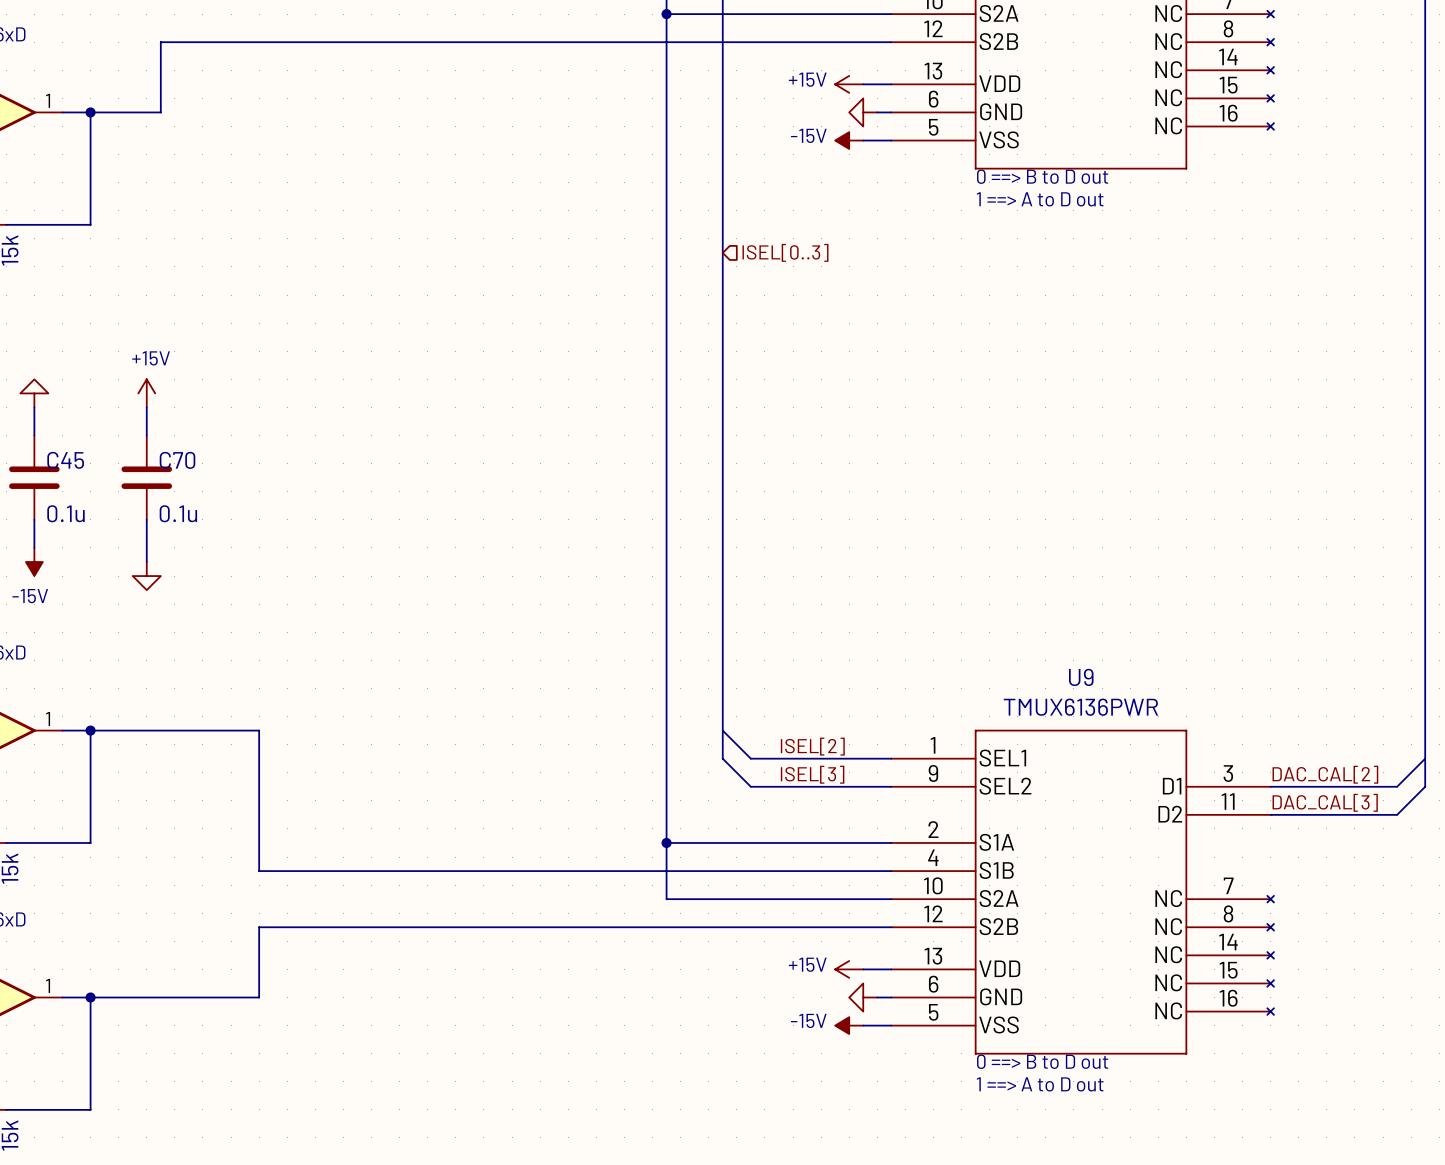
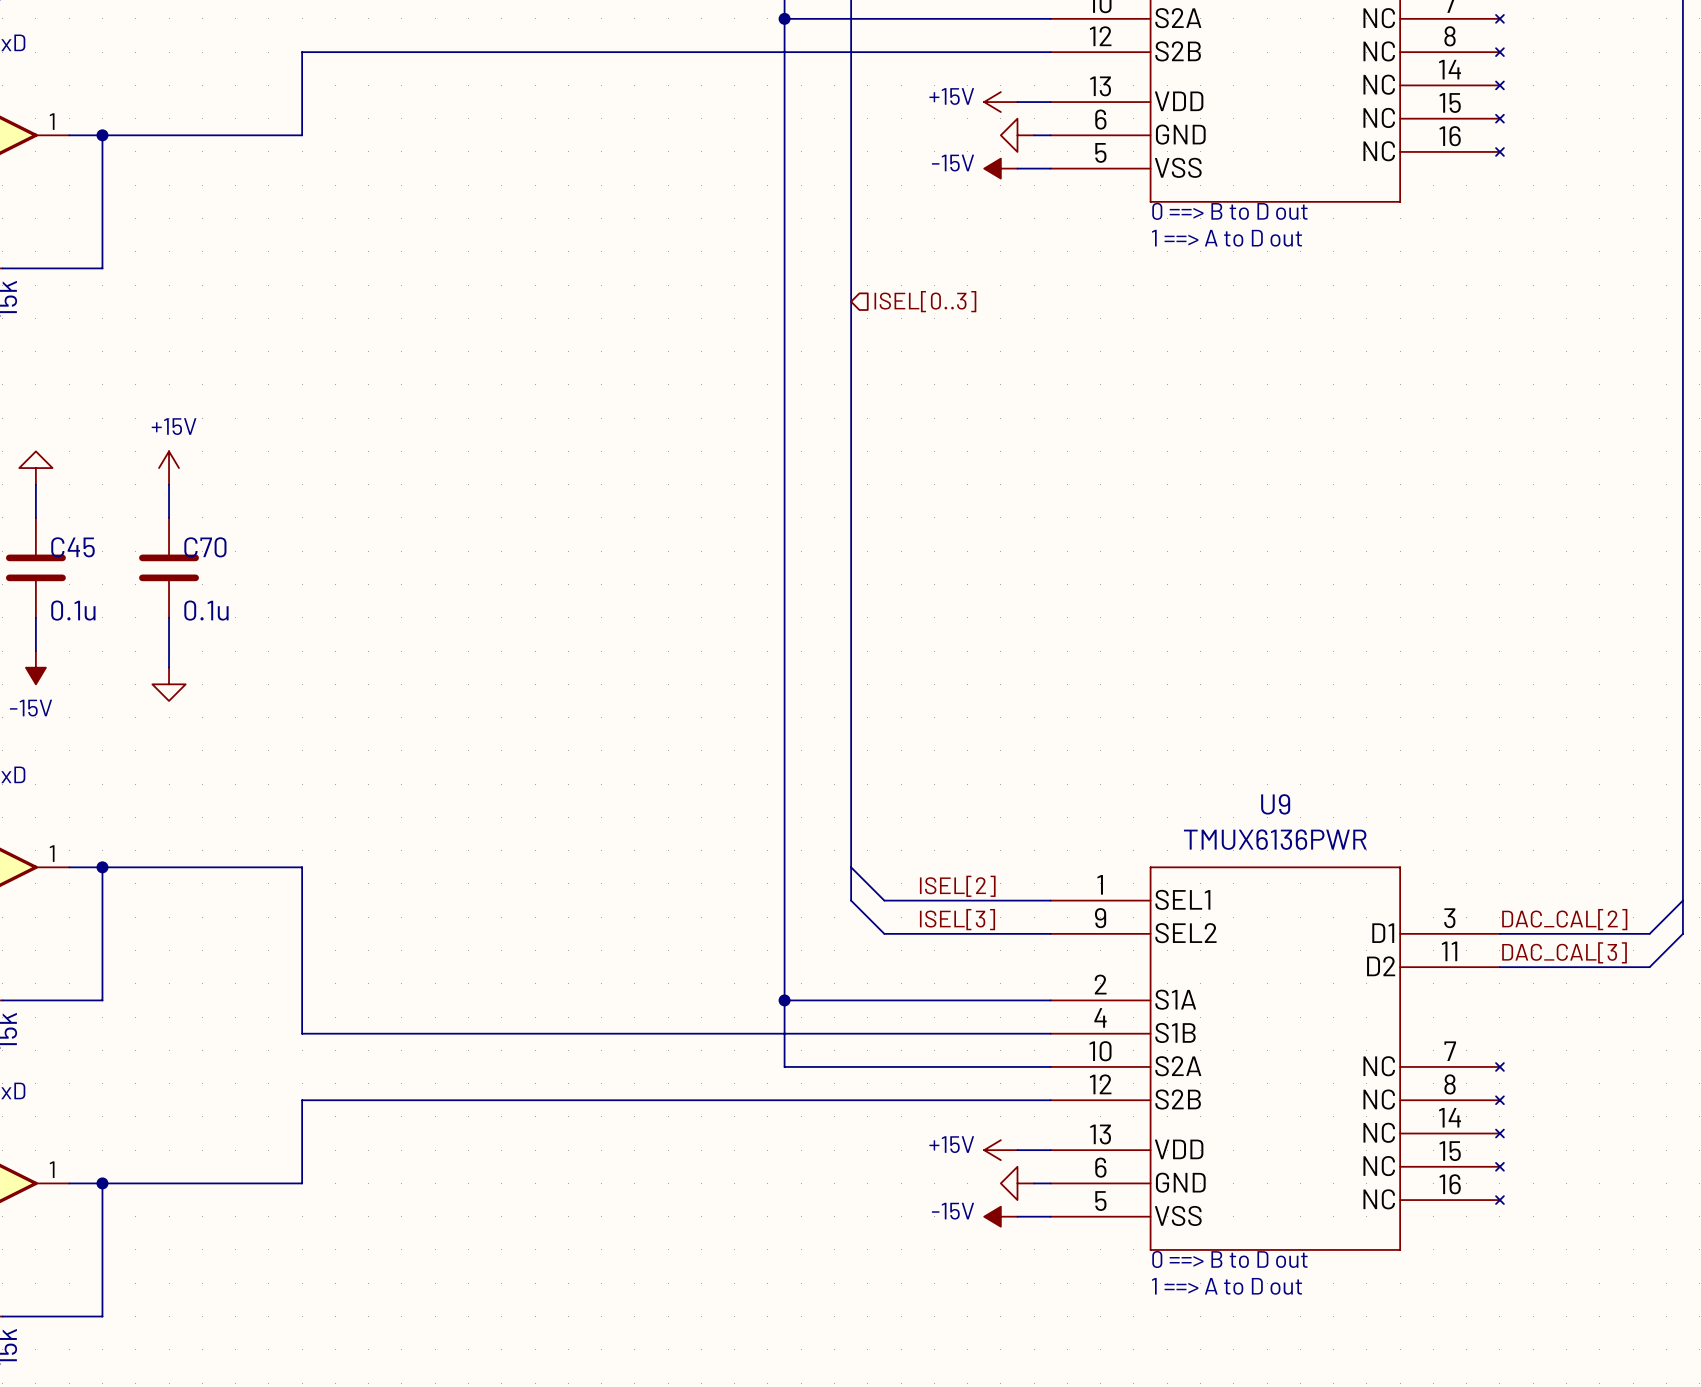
wire: (259, 42) (160, 42) (160, 112) -> (302, 52) (302, 135) (185, 135)

